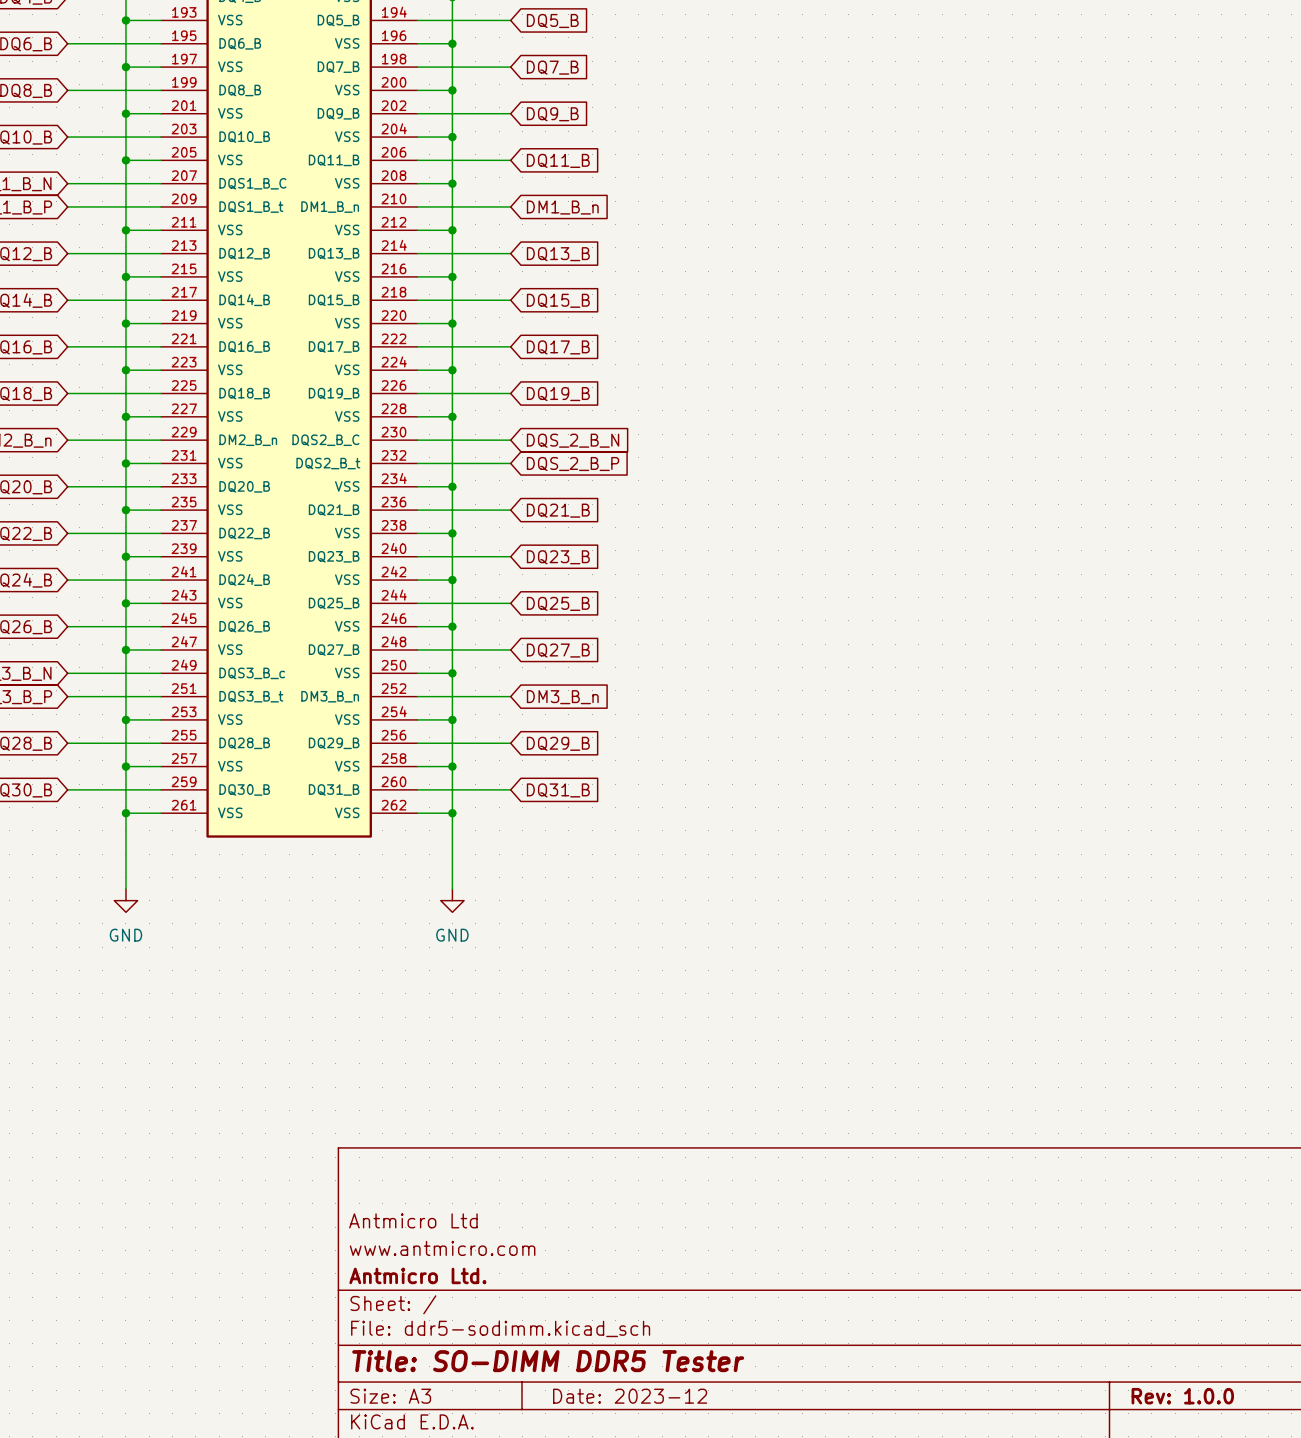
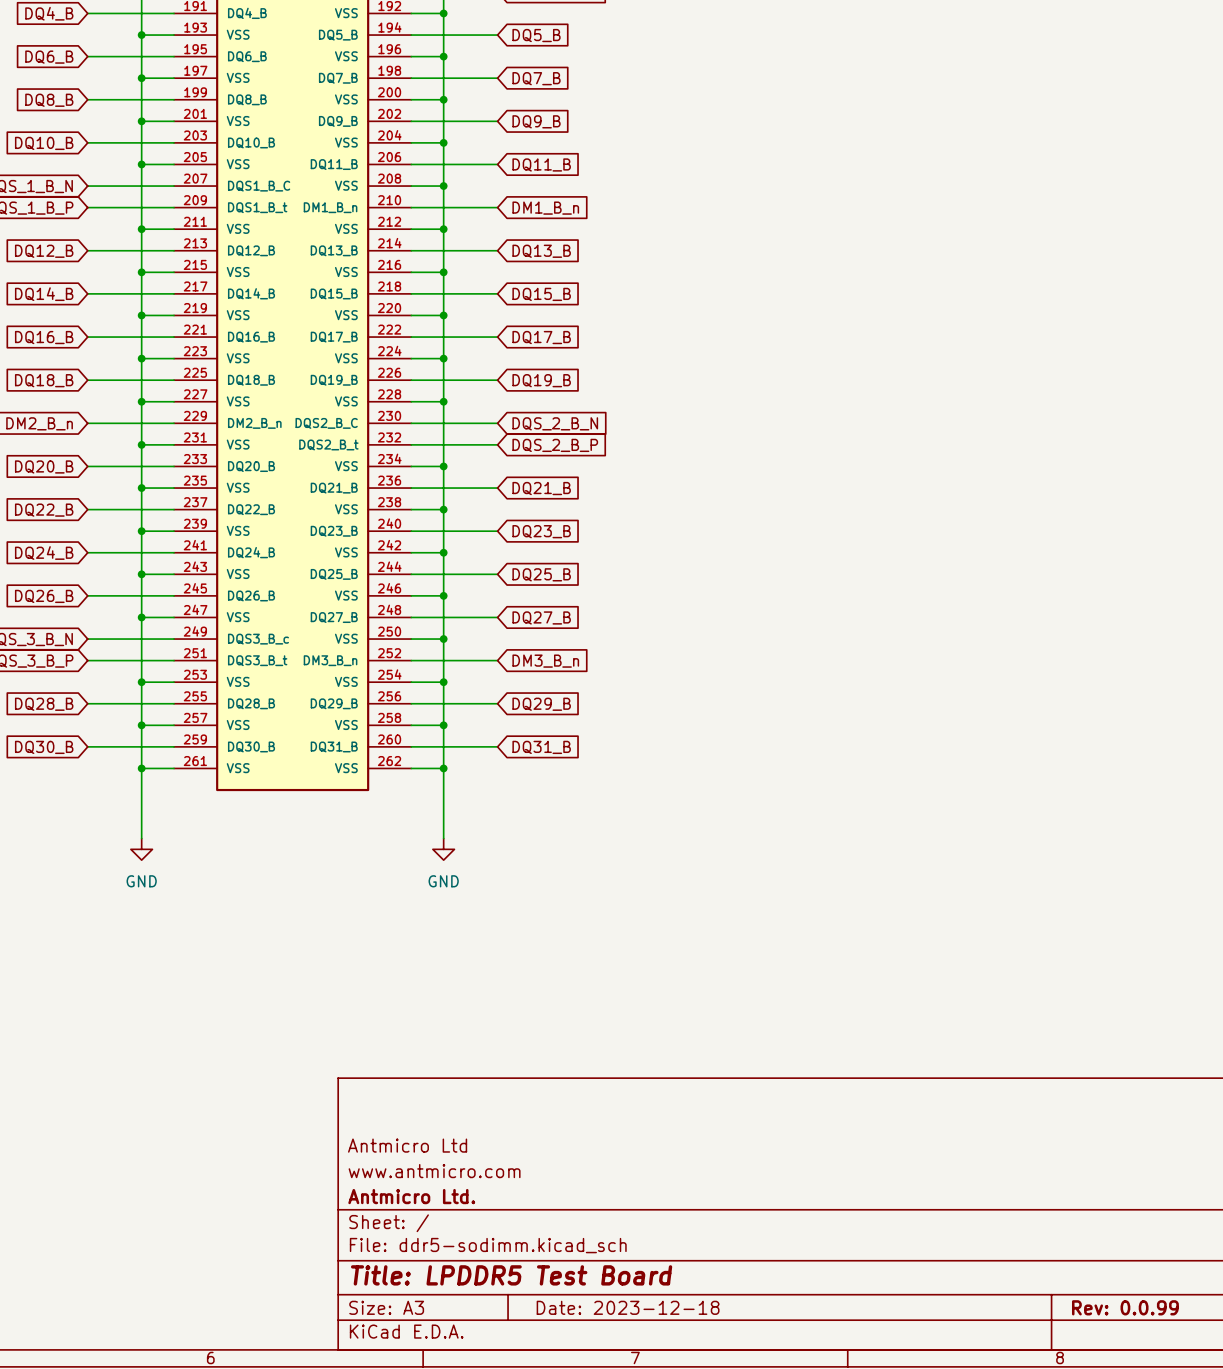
title block: Title: SO-DIMM DDR5 Tester (548, 1361) -> Title: LPDDR5 Test Board (511, 1275)
title block: Date: 2023-12 (630, 1396) -> Date: 2023-12-18 (628, 1307)
title block: Rev: 1.0.0 (1182, 1396) -> Rev: 0.0.99 (1125, 1307)

